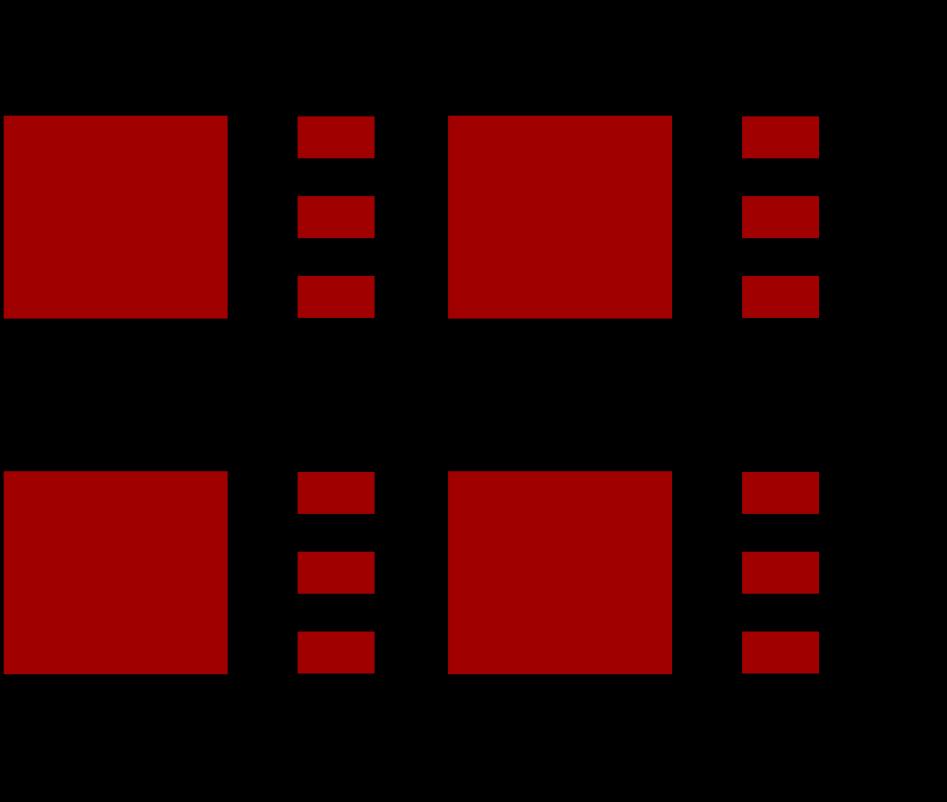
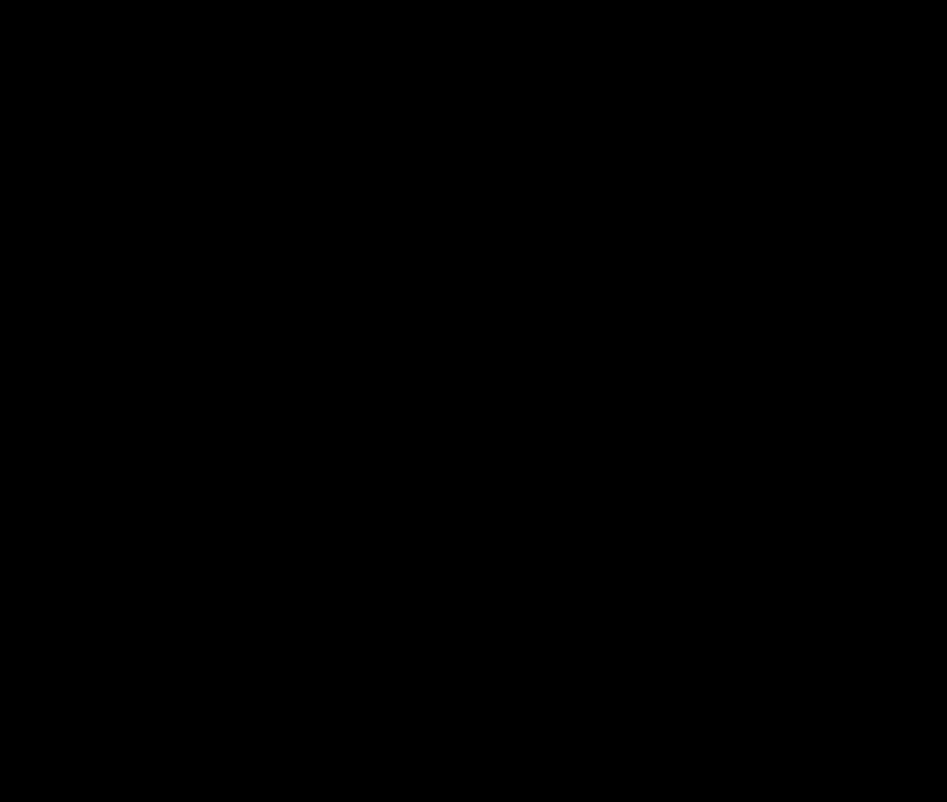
part: (189, 217) -> none
part: (633, 217) -> none
part: (189, 572) -> none
part: (633, 572) -> none

